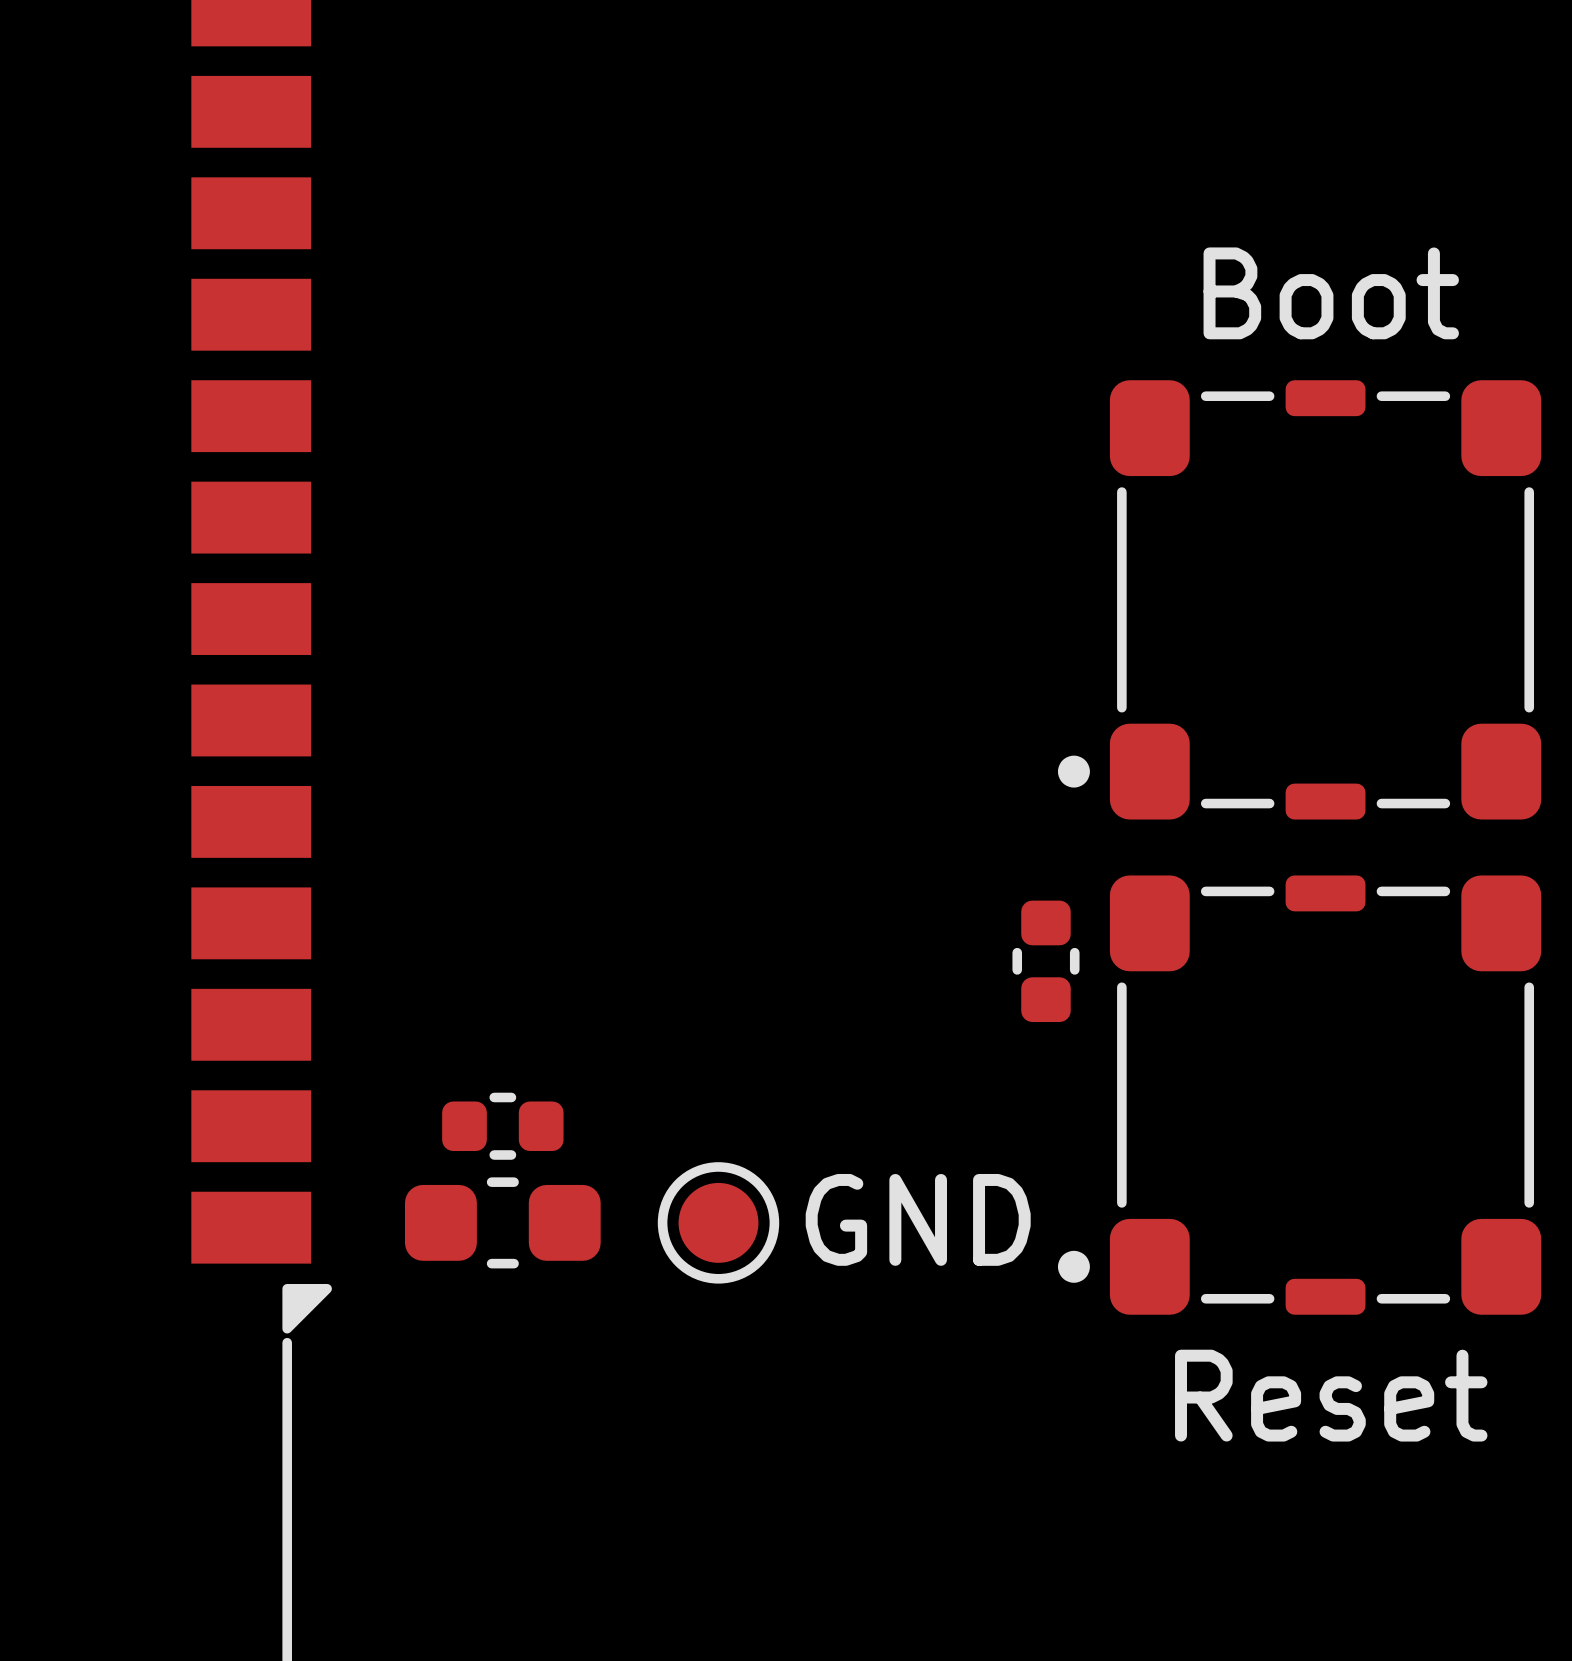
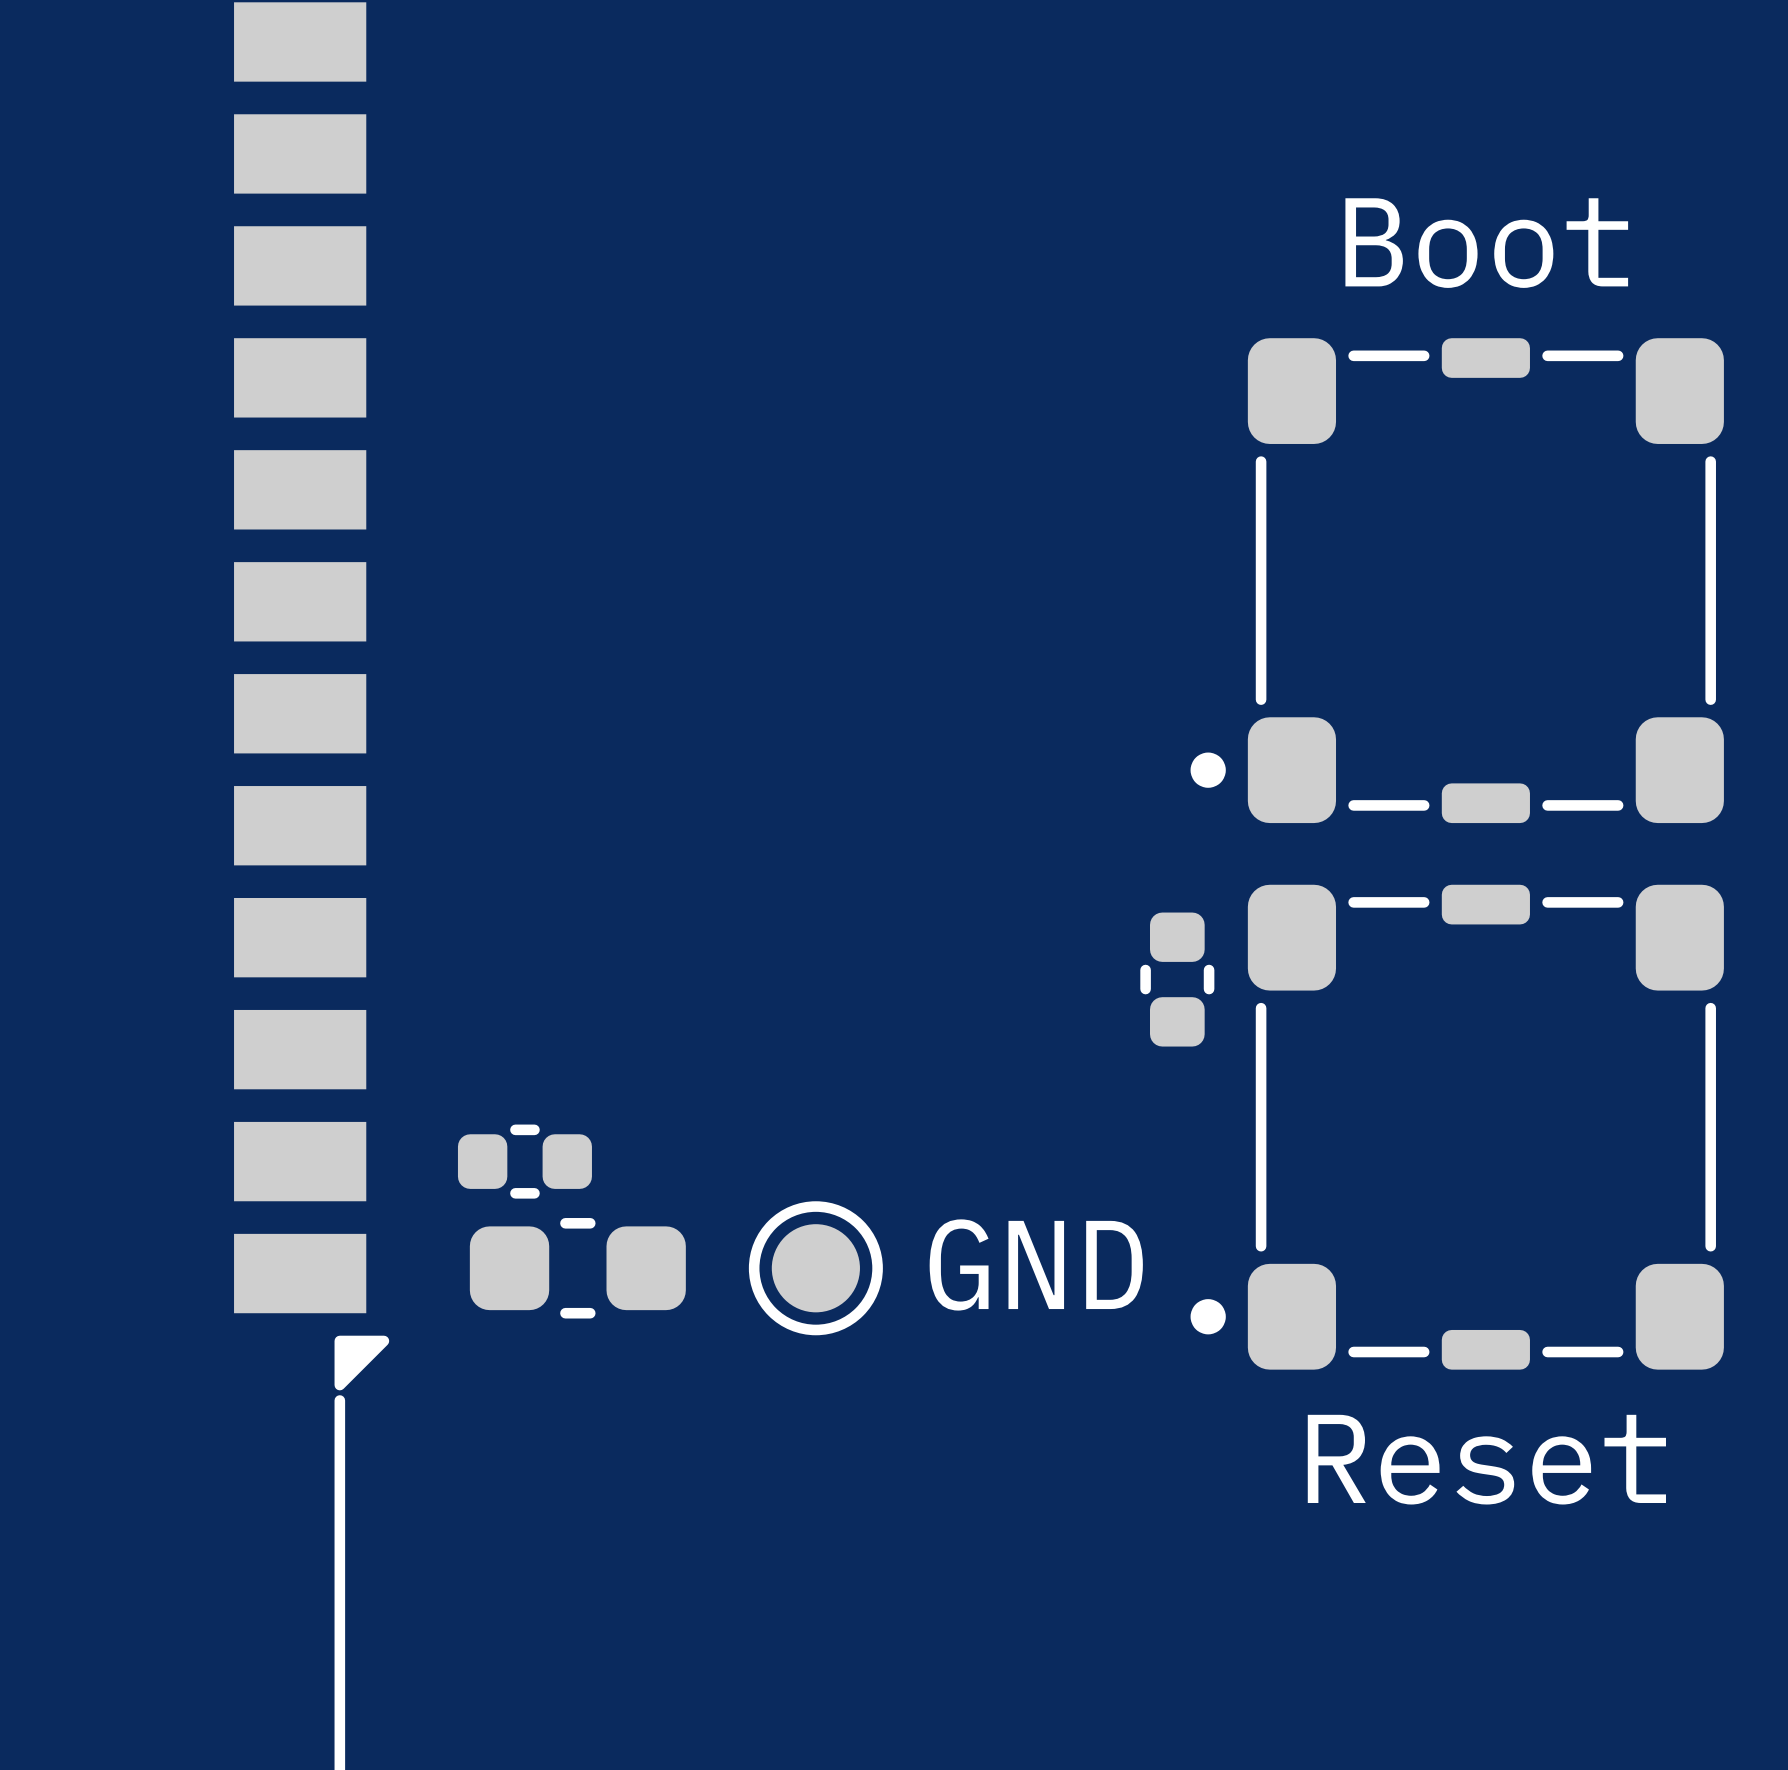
part position: (502, 1126) -> (524, 1161)

